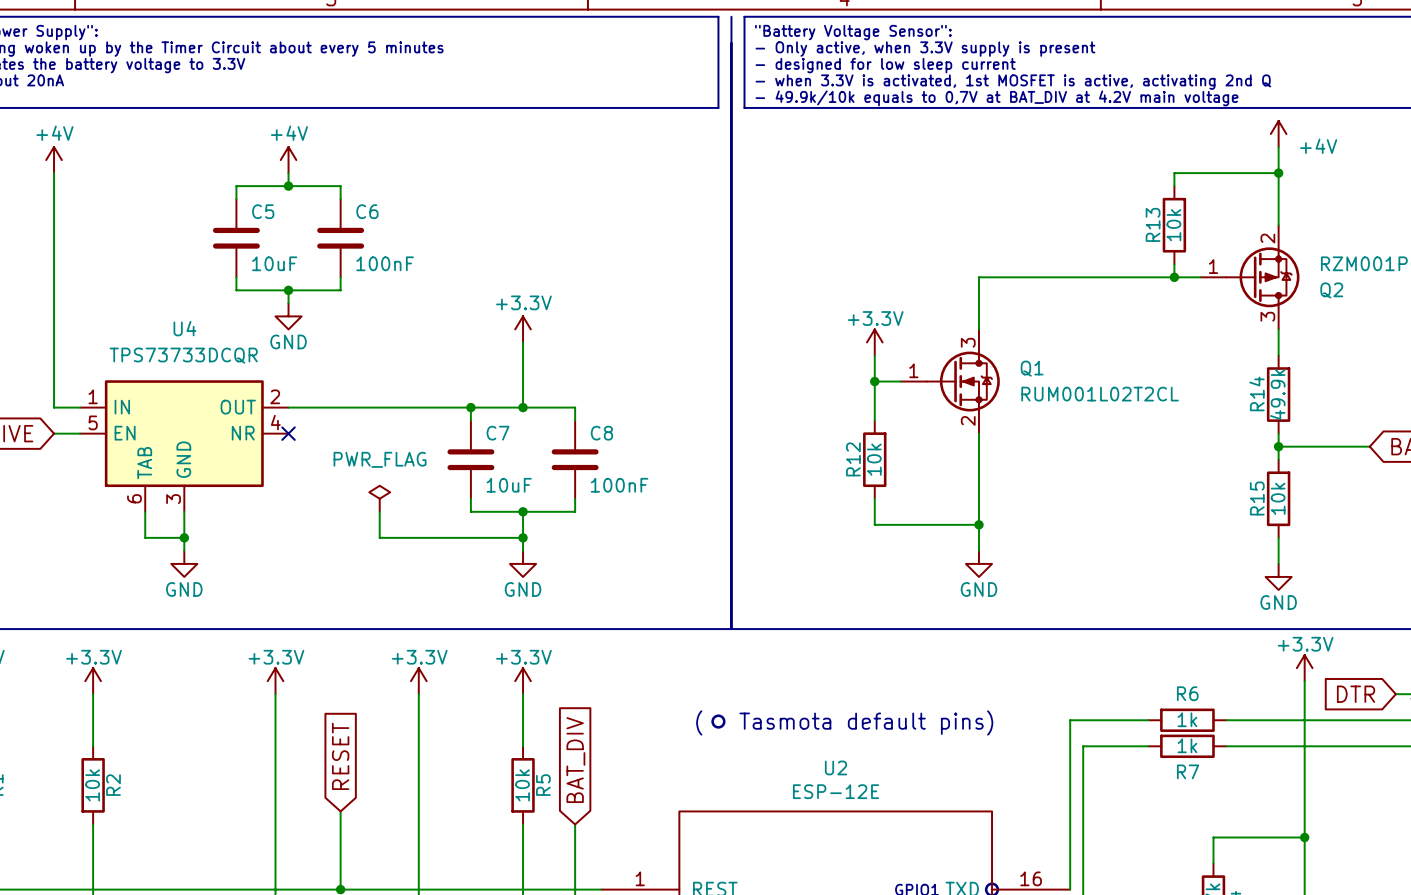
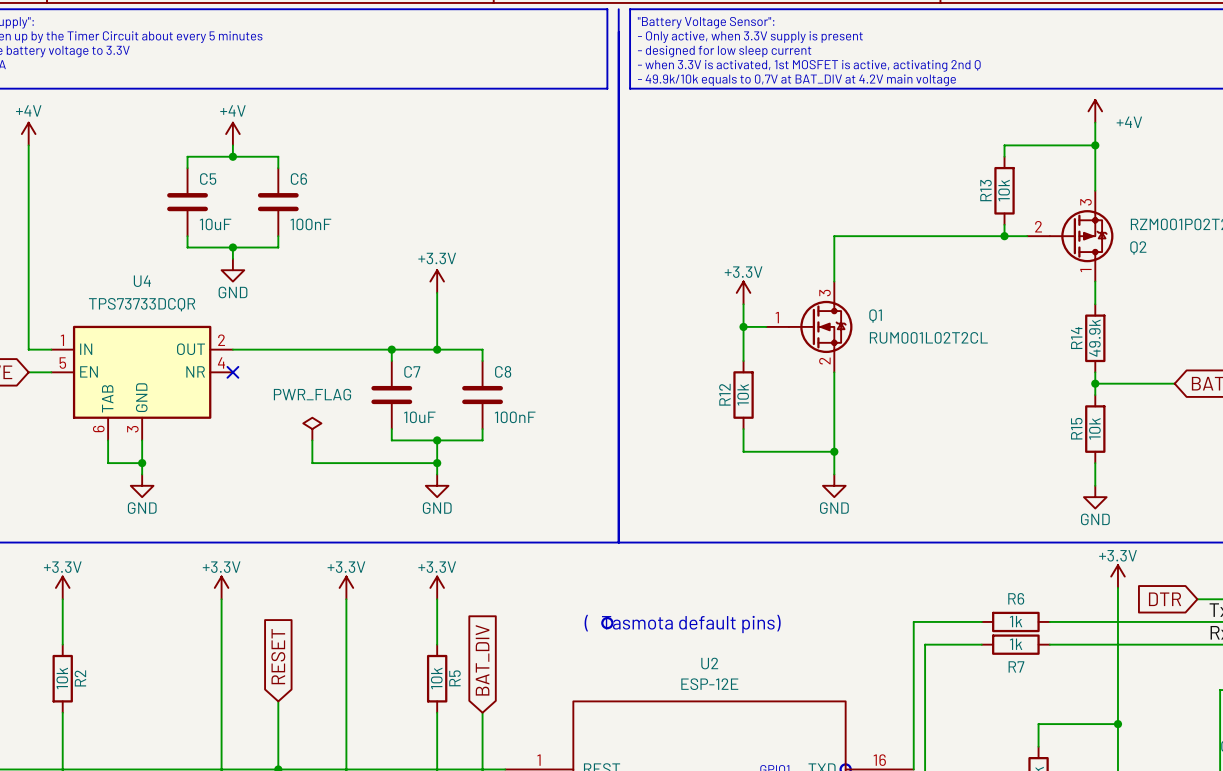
Q2 pin number: 2 (1267, 238) -> 3 (1085, 202)
Q2 pin number: 1 (1213, 266) -> 2 (1038, 226)
Q2 pin number: 3 (1267, 316) -> 1 (1085, 270)

